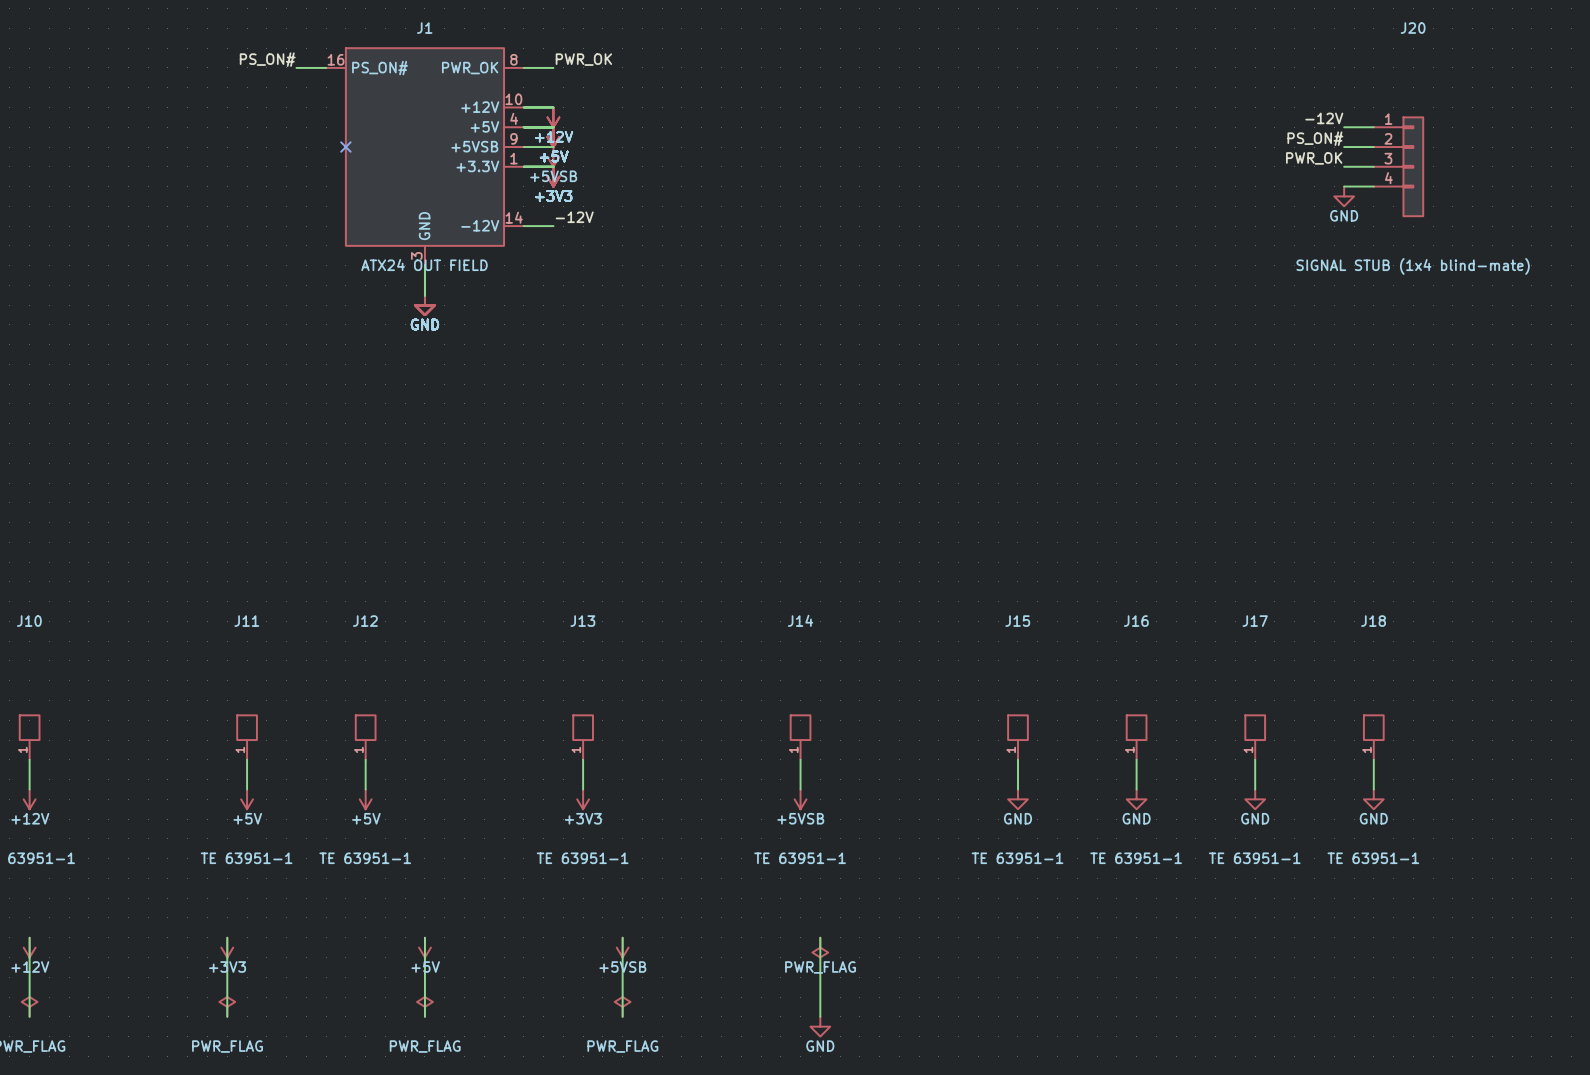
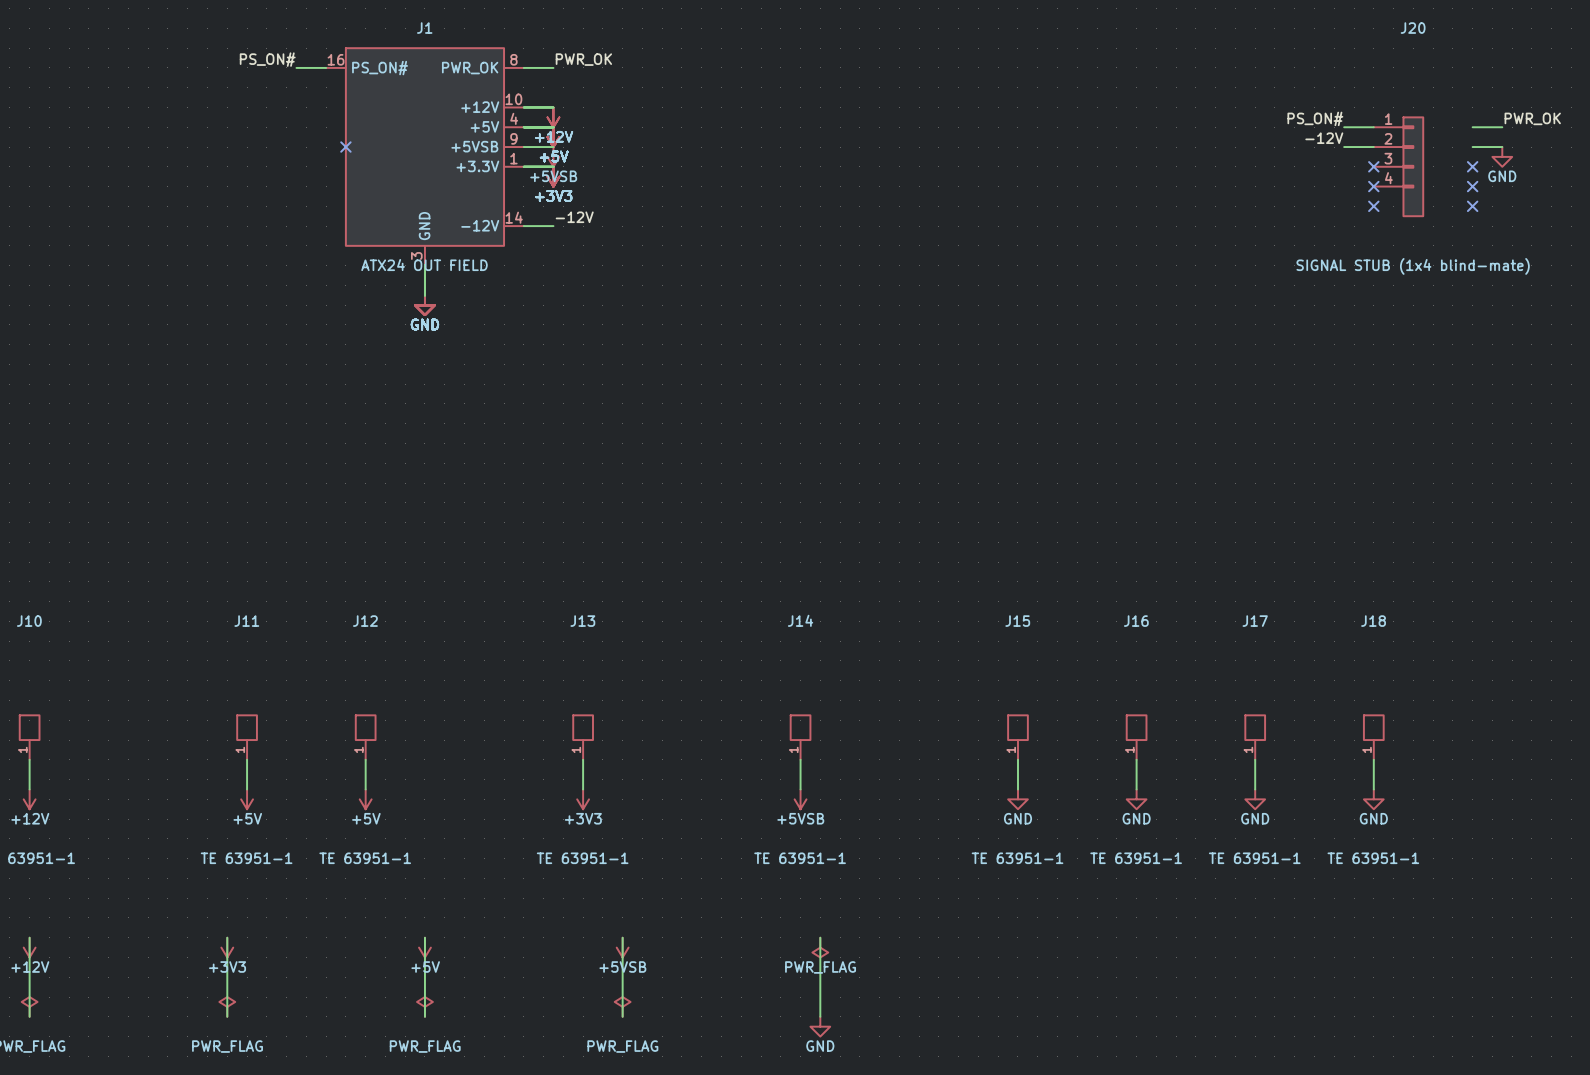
label: -12V (1324, 118) -> PS_ON# (1315, 118)
label: PS_ON# (1315, 138) -> -12V (1324, 138)
label position: PWR_OK (1314, 158) -> PWR_OK (1532, 118)
wire: (1344, 166) (1373, 166) -> (1472, 127) (1502, 127)
no-connect mark: none -> (1373, 166)
no-connect mark: none -> (1472, 166)
wire: (1344, 186) (1373, 186) -> (1472, 147) (1502, 147)
no-connect mark: none -> (1373, 186)
no-connect mark: none -> (1472, 186)
power symbol position: GND (1344, 196) -> GND (1502, 156)
no-connect mark: none -> (1373, 206)
no-connect mark: none -> (1472, 206)

